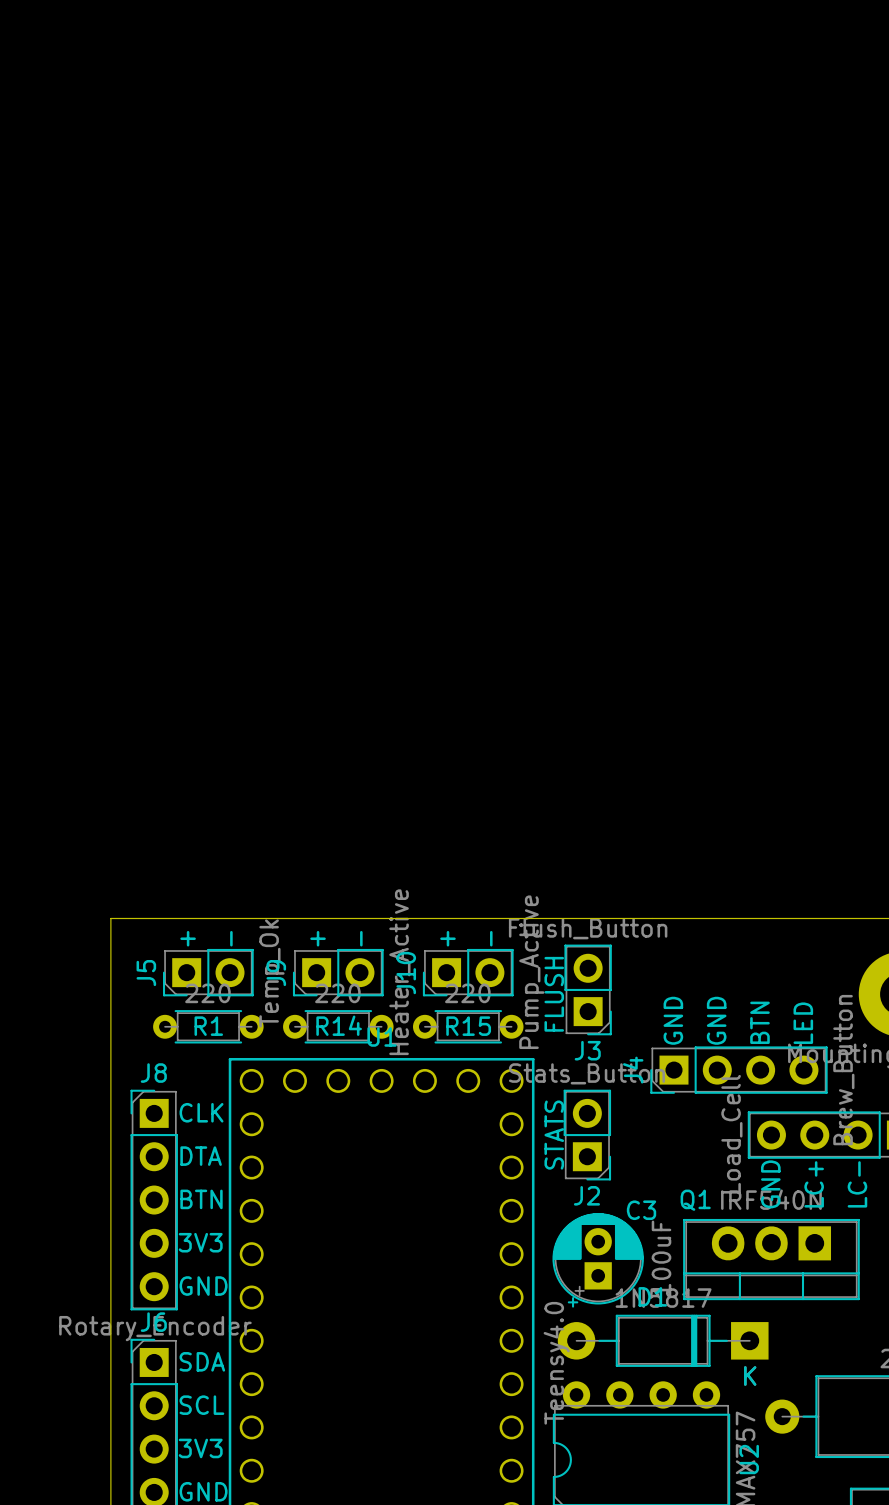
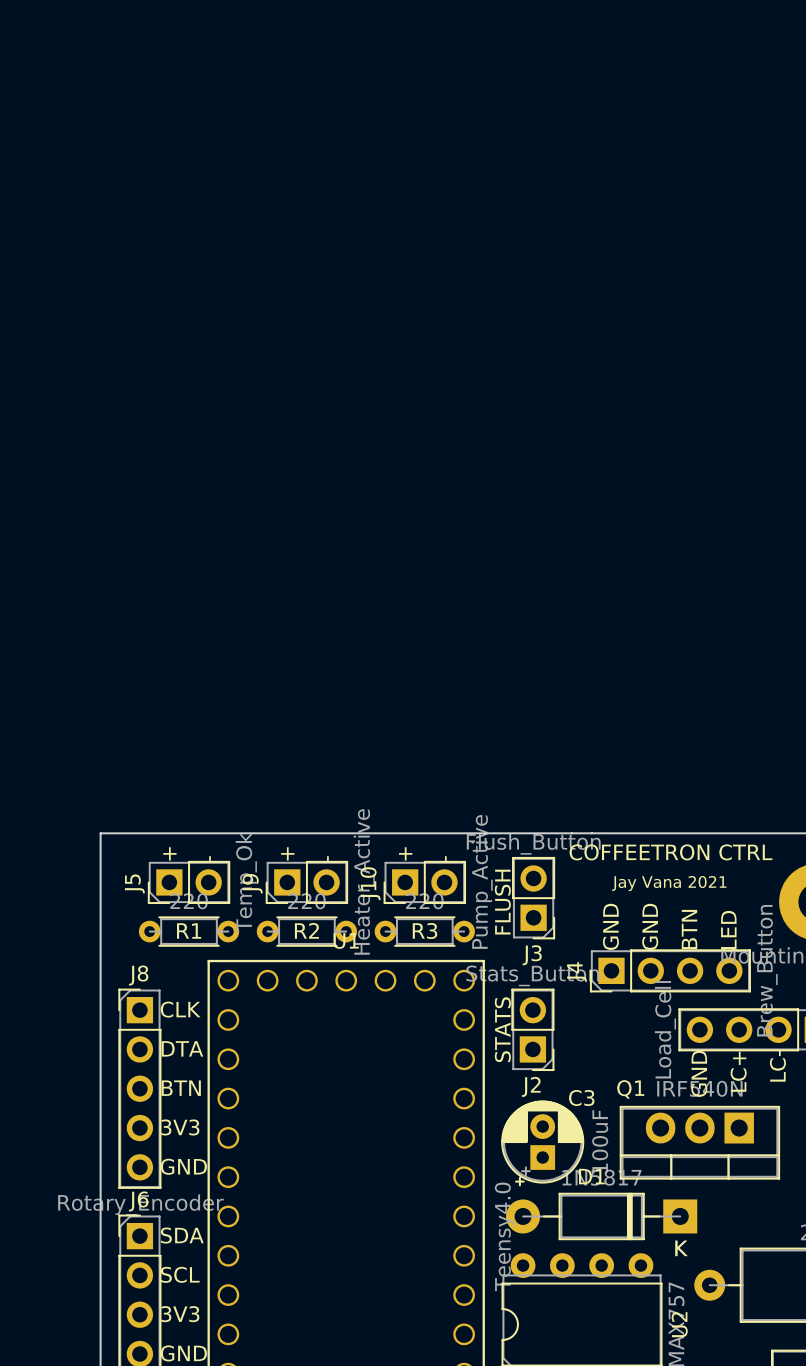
text: none -> COFFEETRON CTRL (670, 852)
text: none -> Jay Vana 2021 (669, 883)
R14 name: R14 (339, 1025) -> R2 (306, 930)
R15 name: R15 (468, 1026) -> R3 (425, 930)

